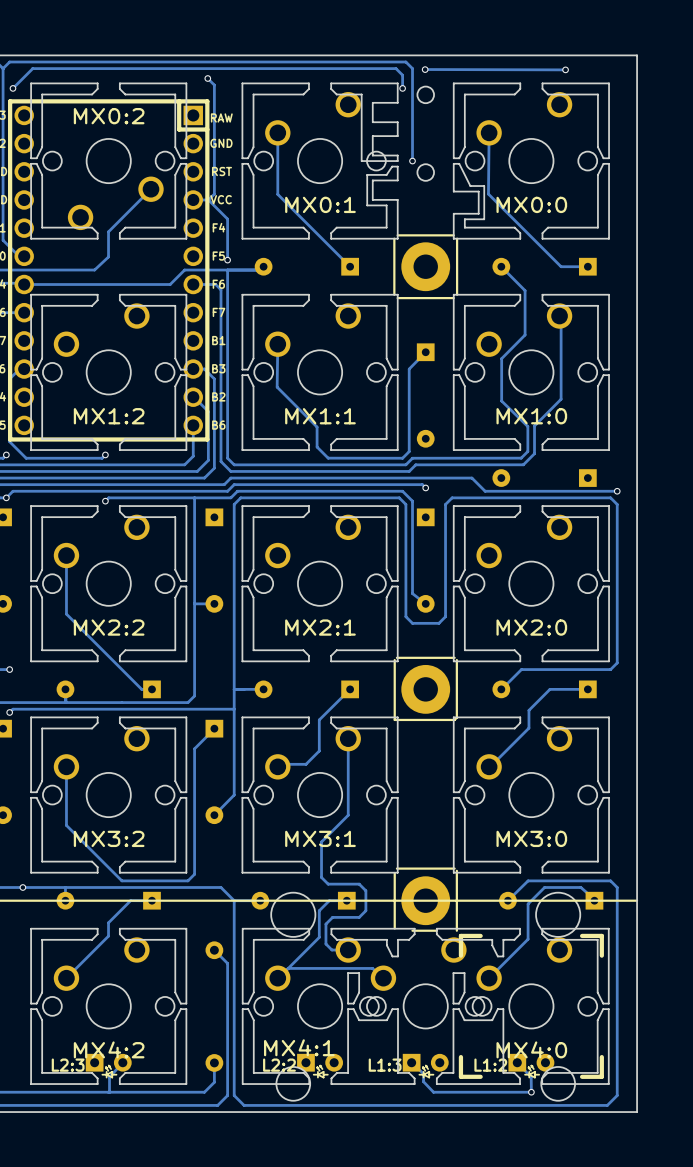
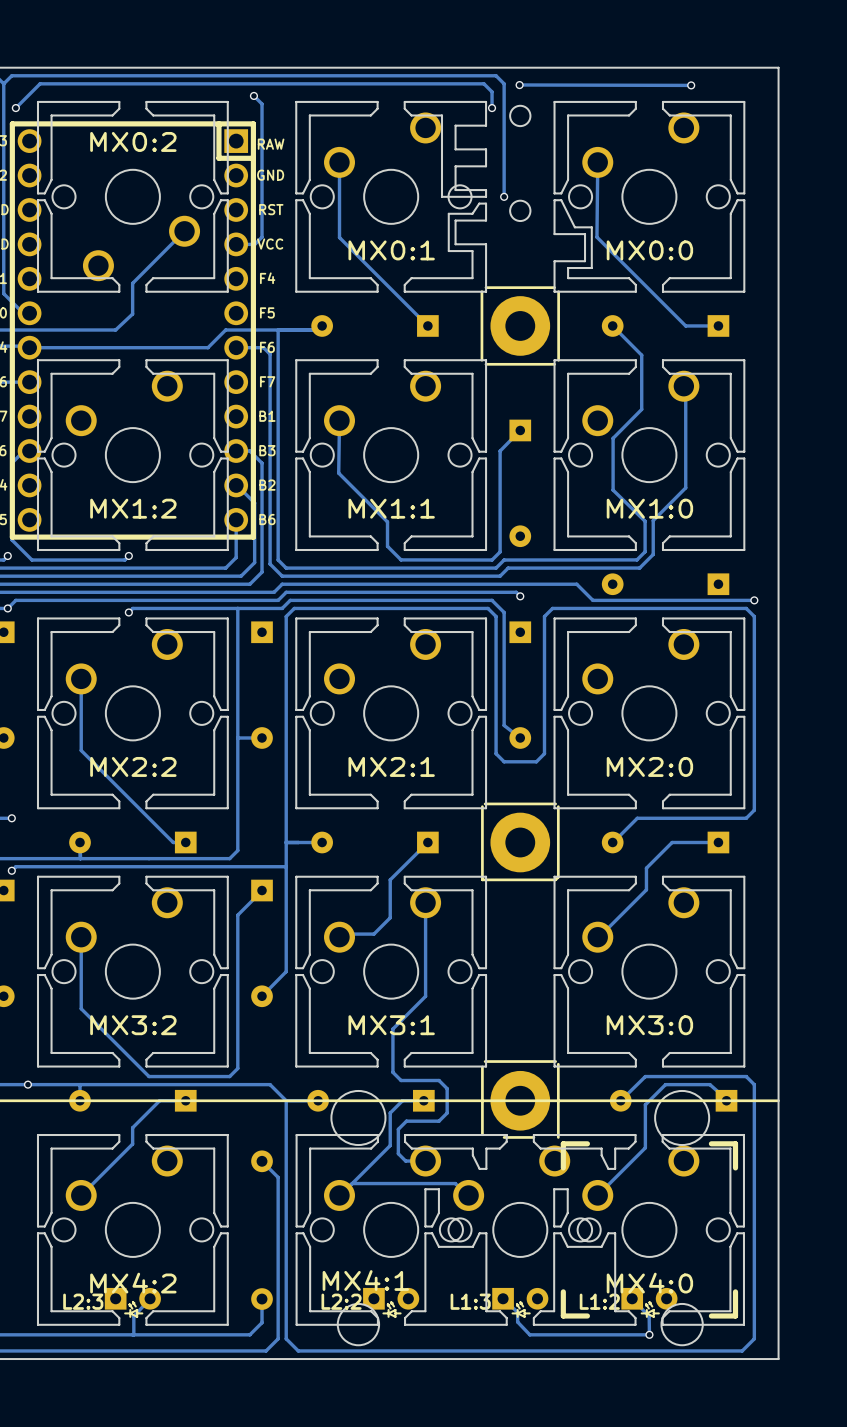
track: (208, 199) (227, 219) (227, 260) -> none
via: (227, 260) -> none

